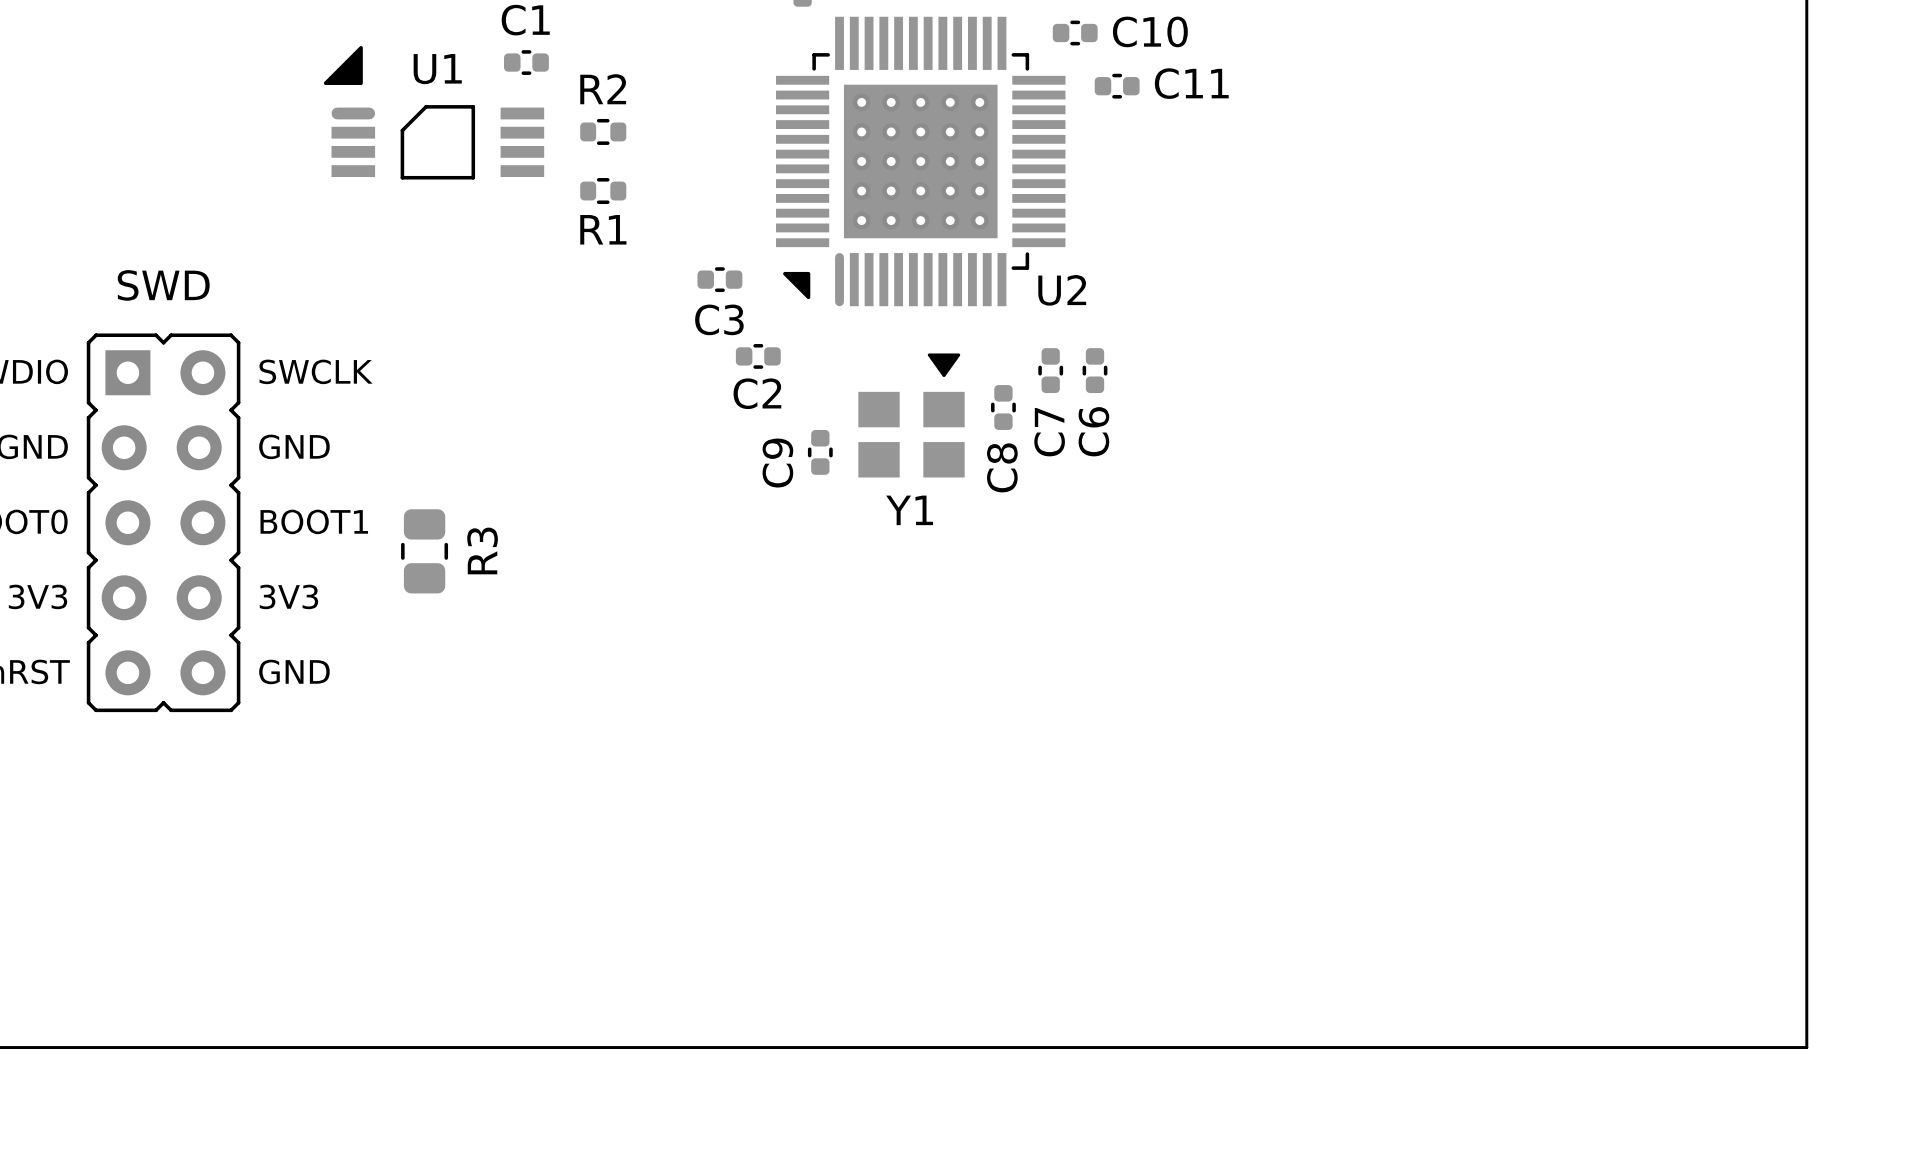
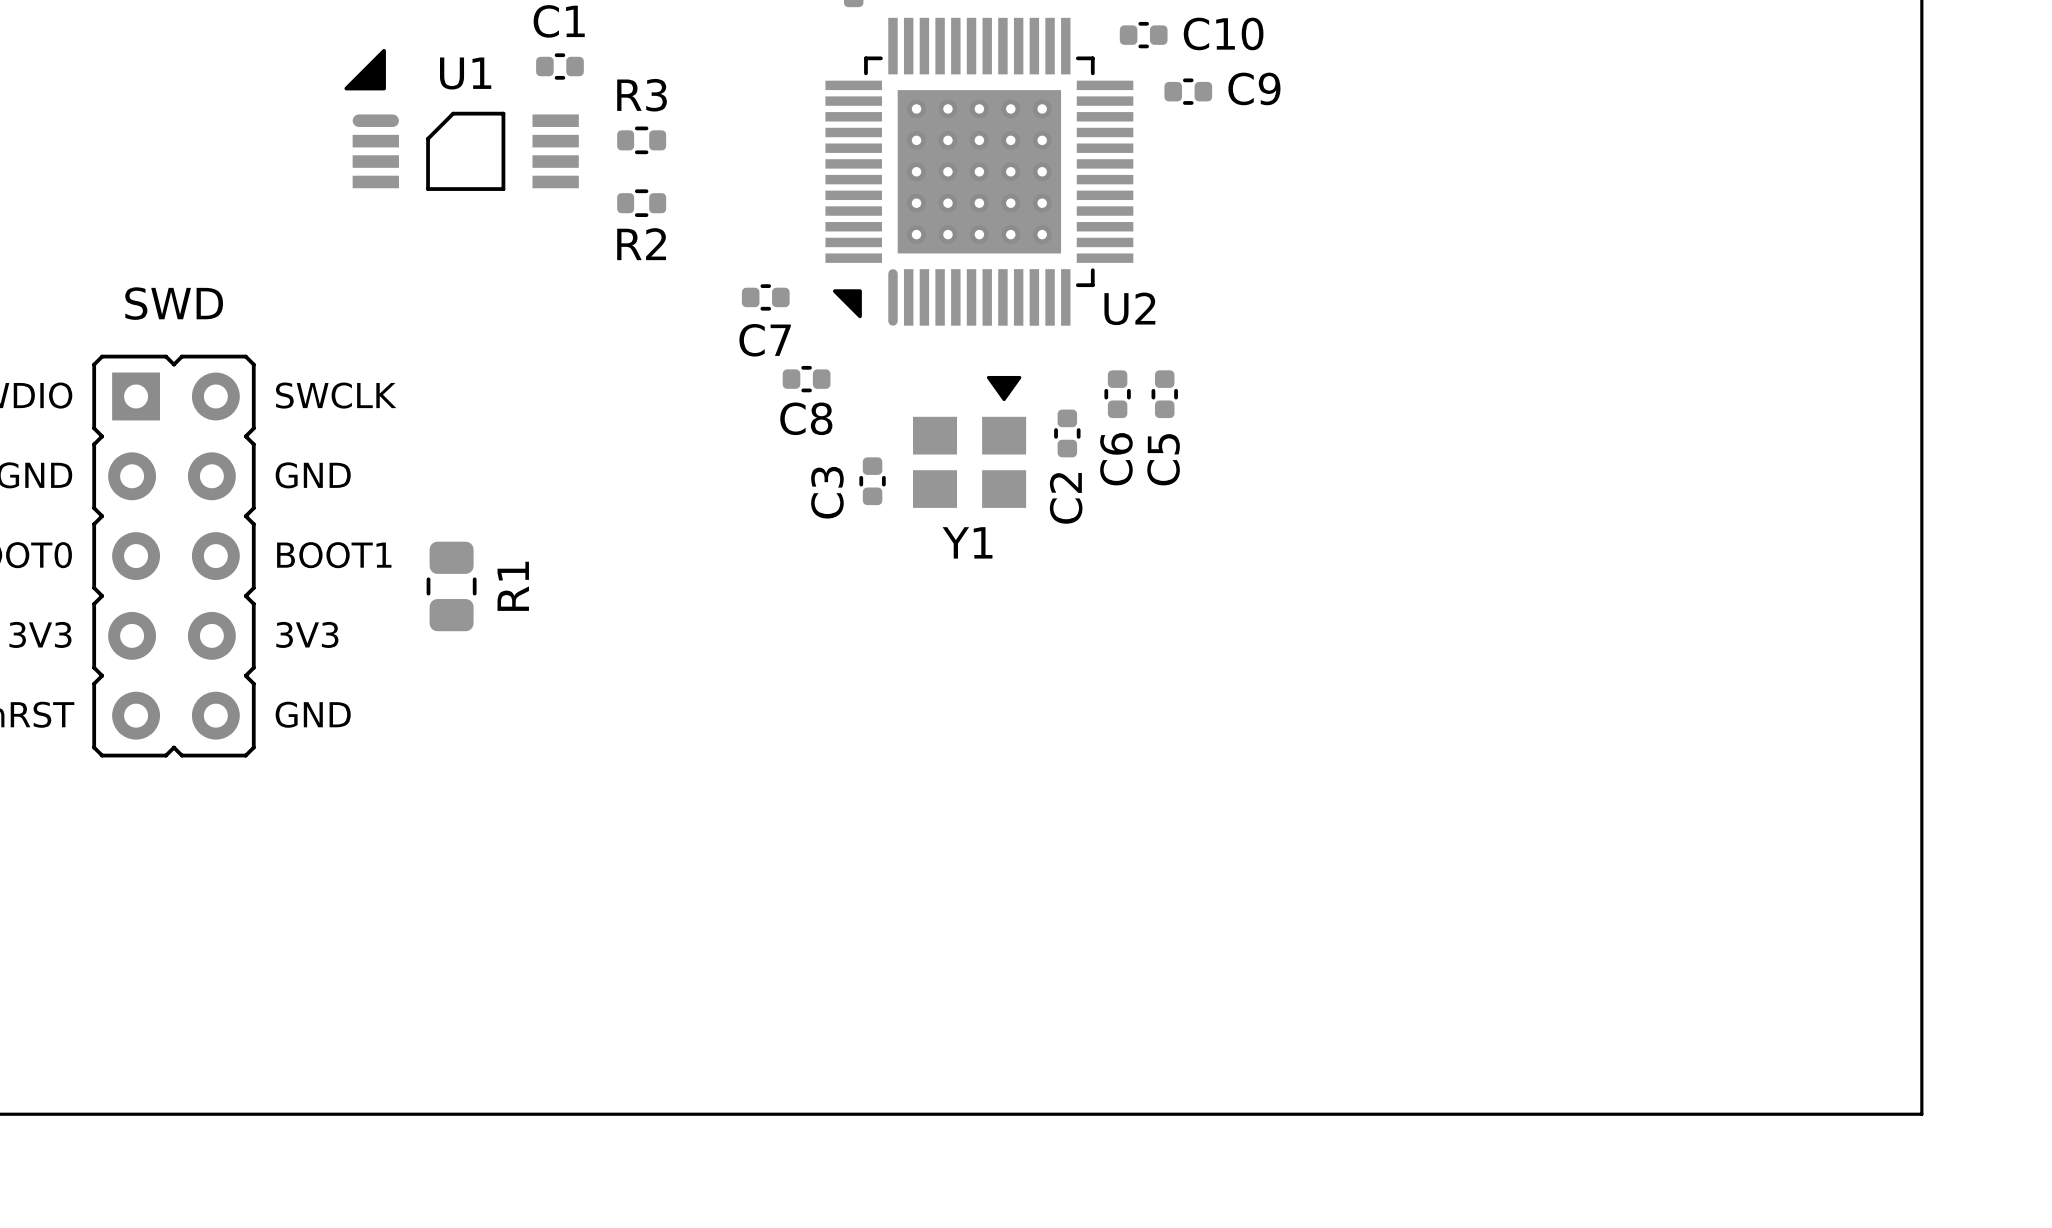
C11 name: C11 (1191, 83) -> C9 (1254, 88)
R2 name: R2 (603, 89) -> R3 (642, 95)
R1 name: R1 (603, 229) -> R2 (641, 244)
C3 name: C3 (719, 319) -> C7 (765, 340)
C2 name: C2 (757, 393) -> C8 (806, 418)
C6 name: C6 (1093, 431) -> C5 (1163, 459)
C7 name: C7 (1049, 432) -> C6 (1116, 459)
C9 name: C9 (777, 463) -> C3 (827, 492)
C8 name: C8 (1002, 467) -> C2 (1066, 498)
R3 name: R3 (482, 550) -> R1 (513, 586)

